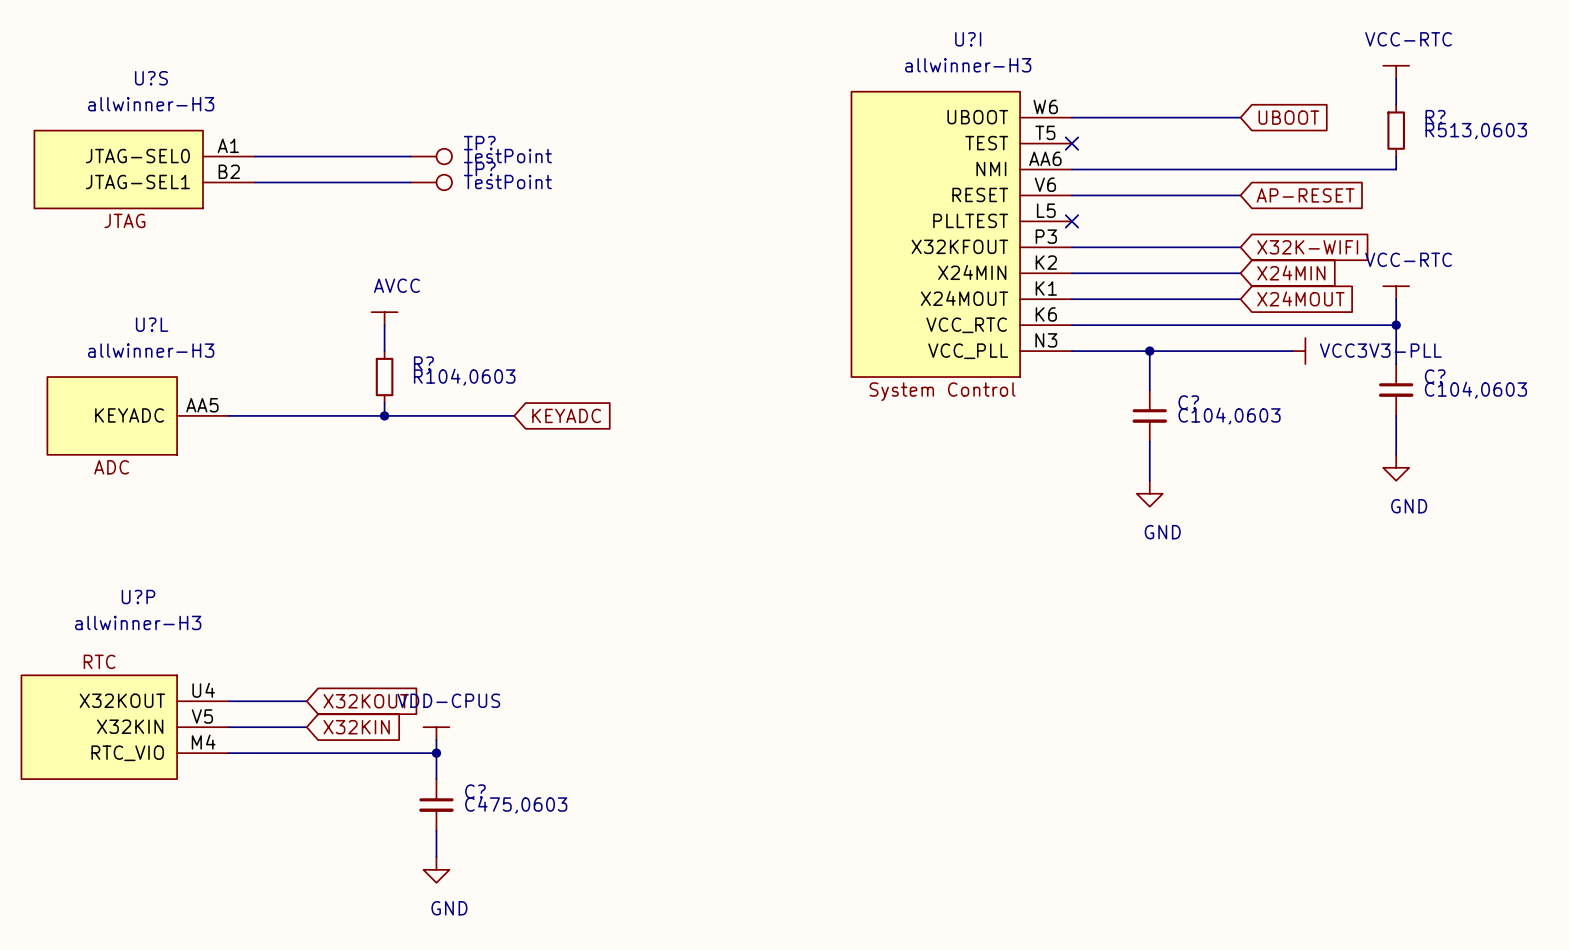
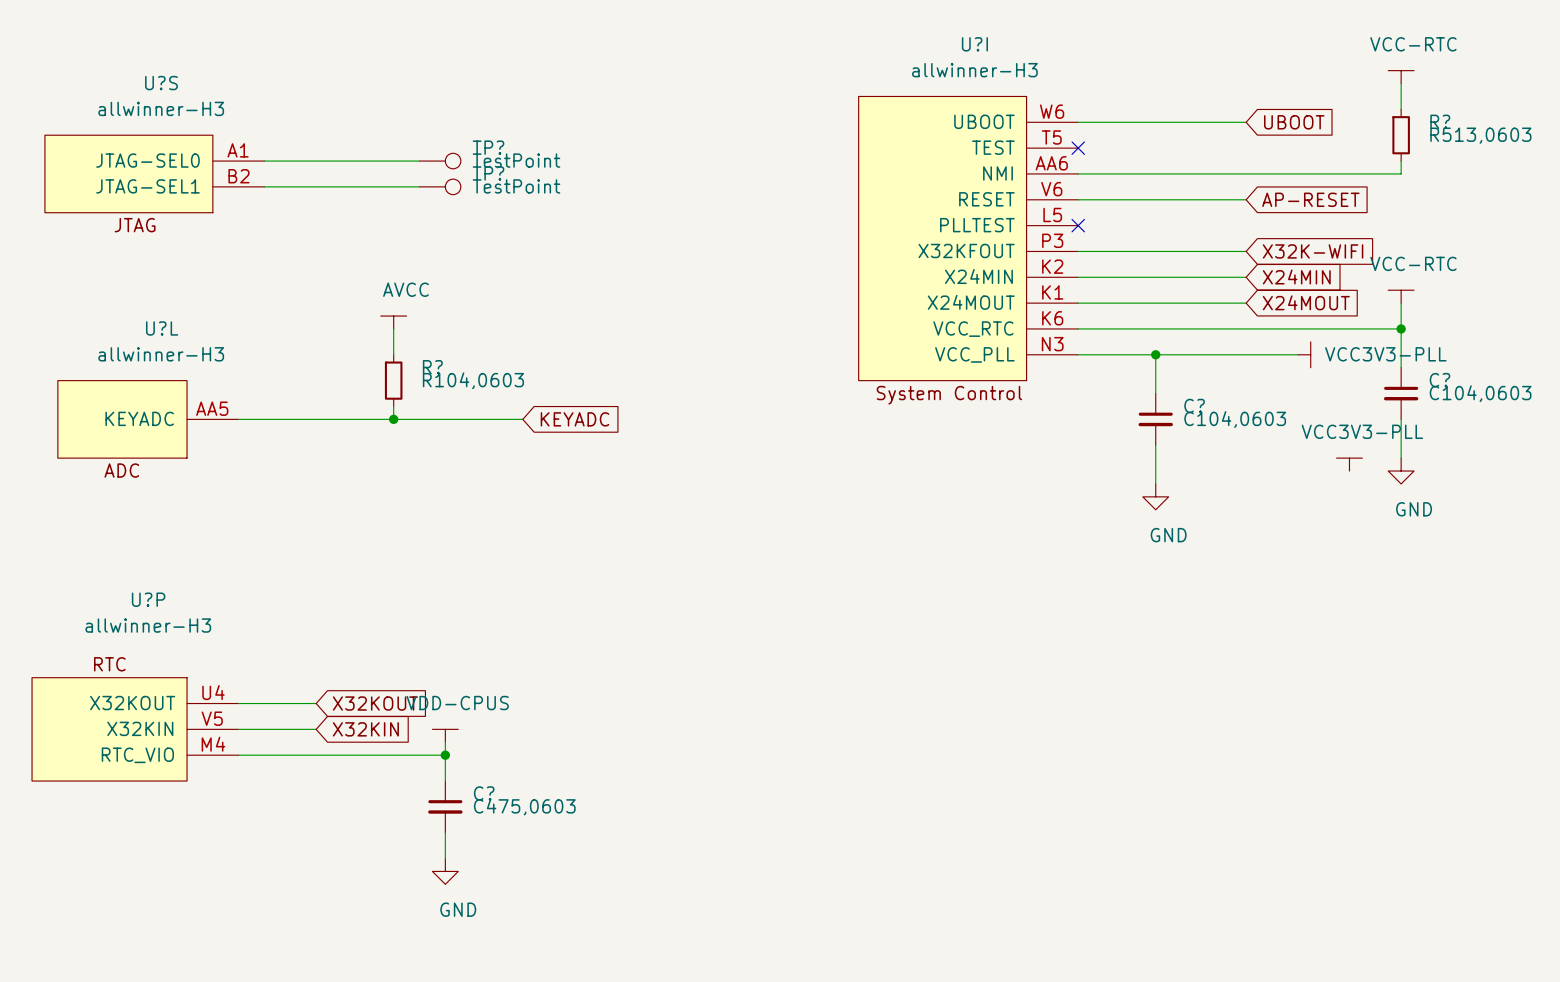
power symbol: none -> VCC3V3-PLL (1349, 464)

